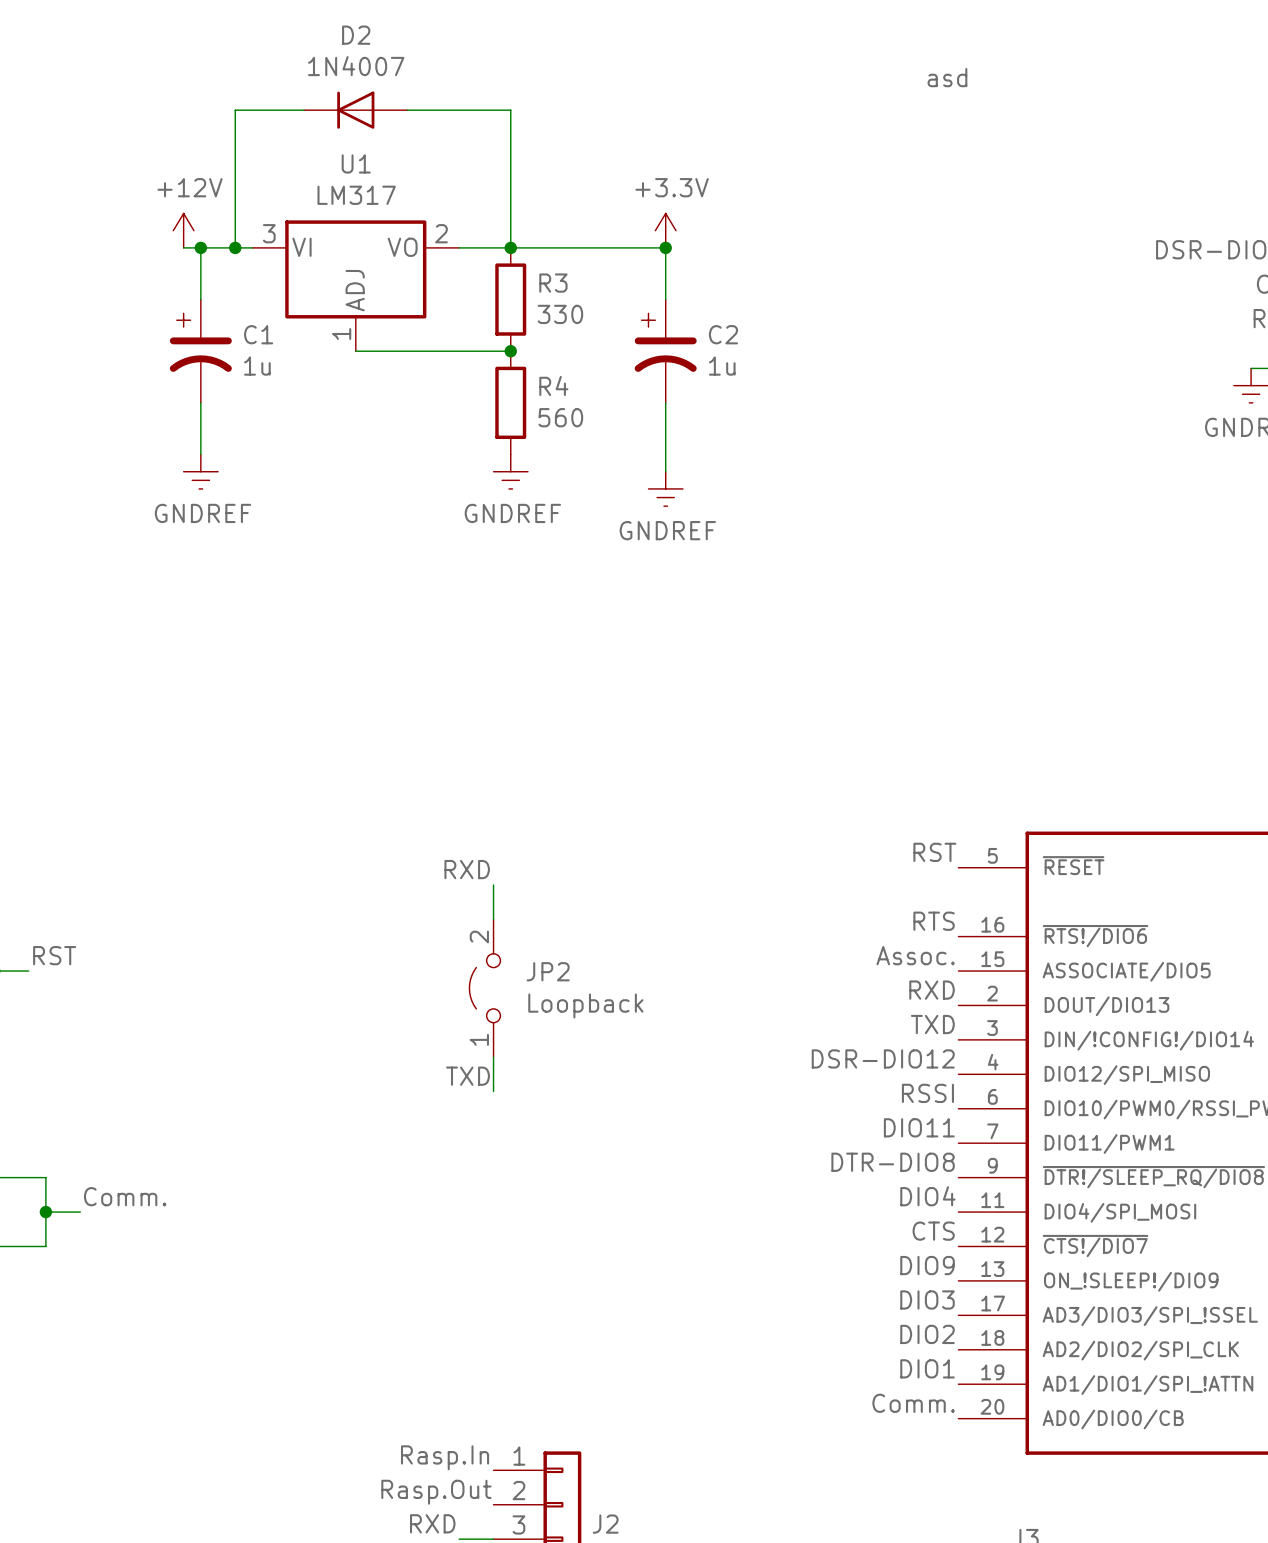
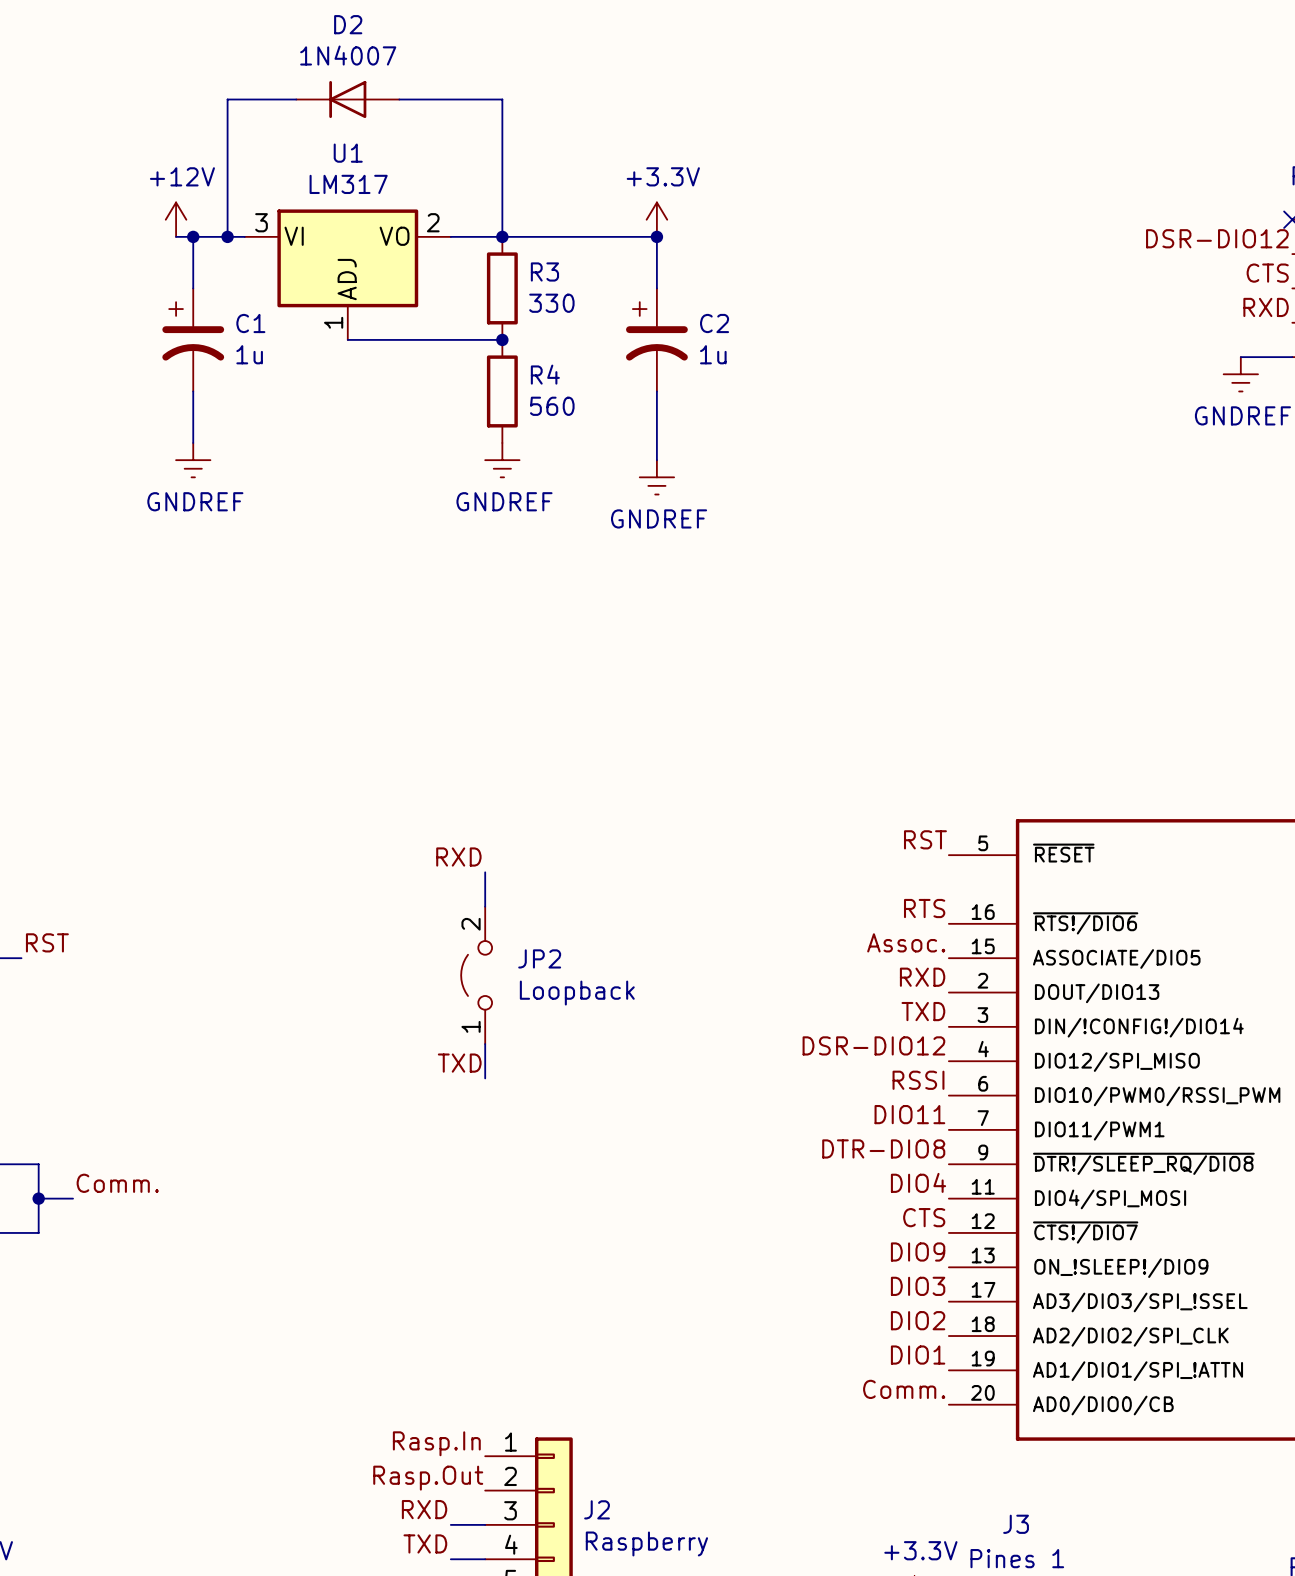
label: asd (947, 77) -> none

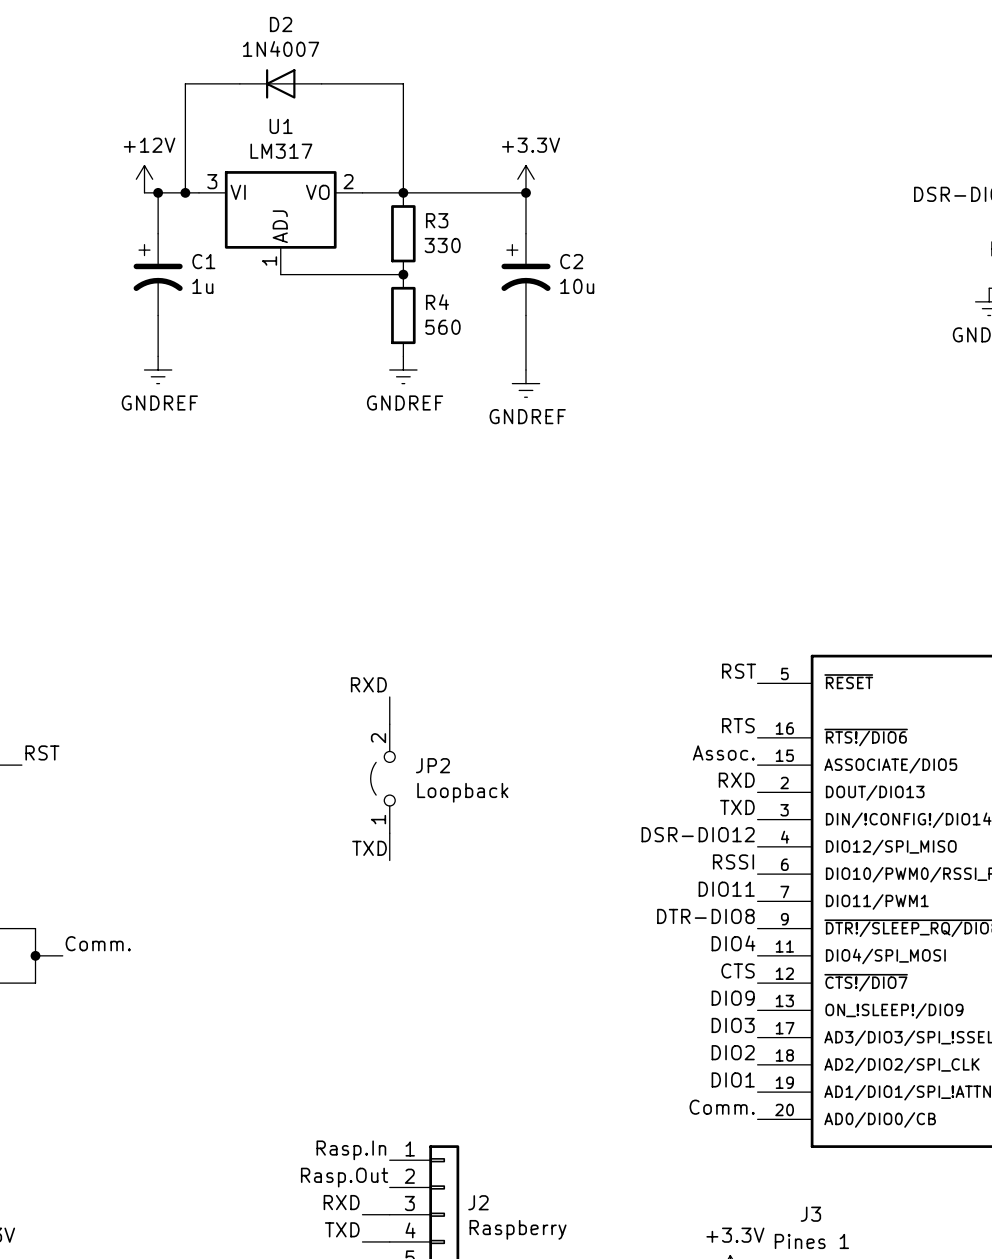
C2 value: 1u (713, 354) -> 10u (577, 286)

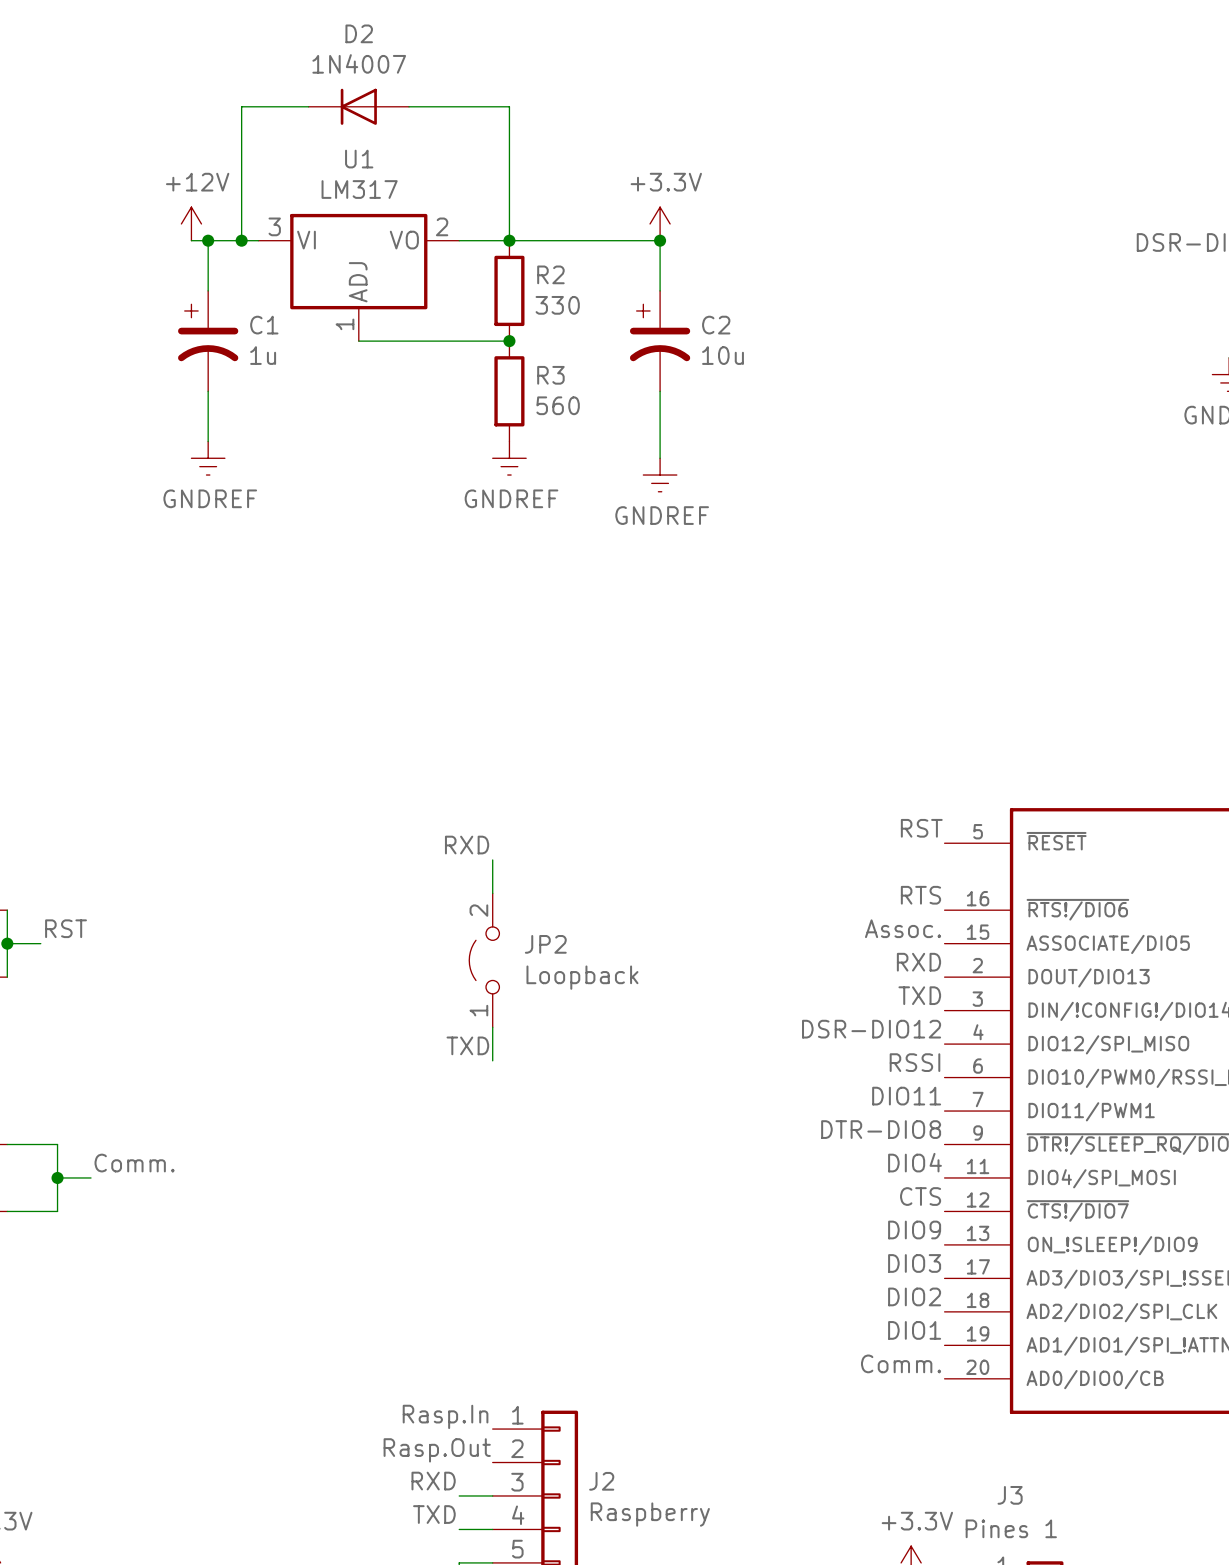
R3 name: R3 (437, 220) -> R2 (550, 274)
R4 name: R4 (437, 302) -> R3 (550, 375)

